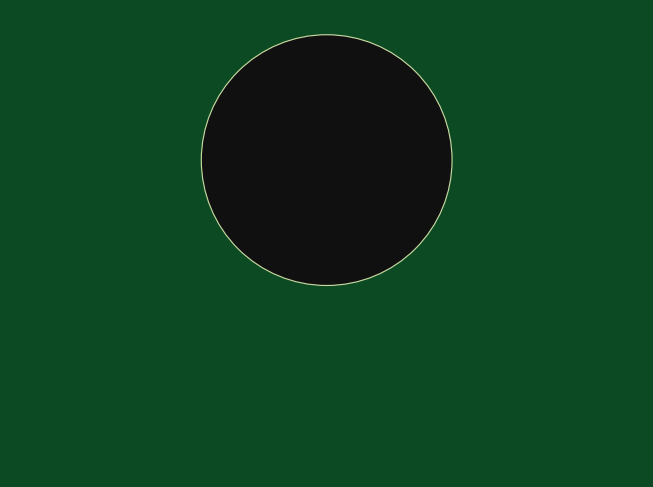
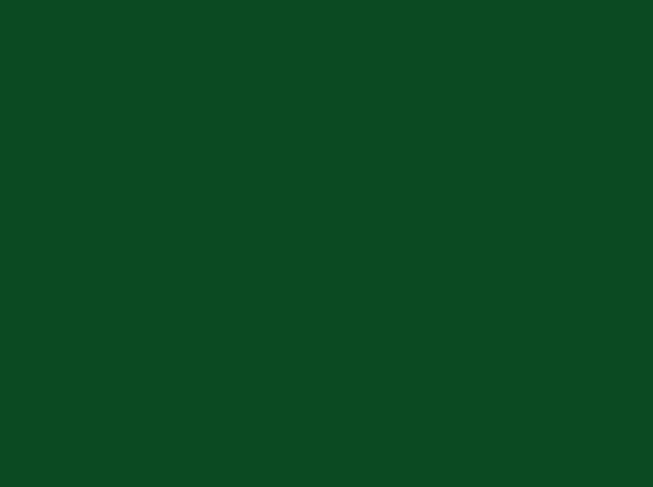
part: (326, 160) -> none

